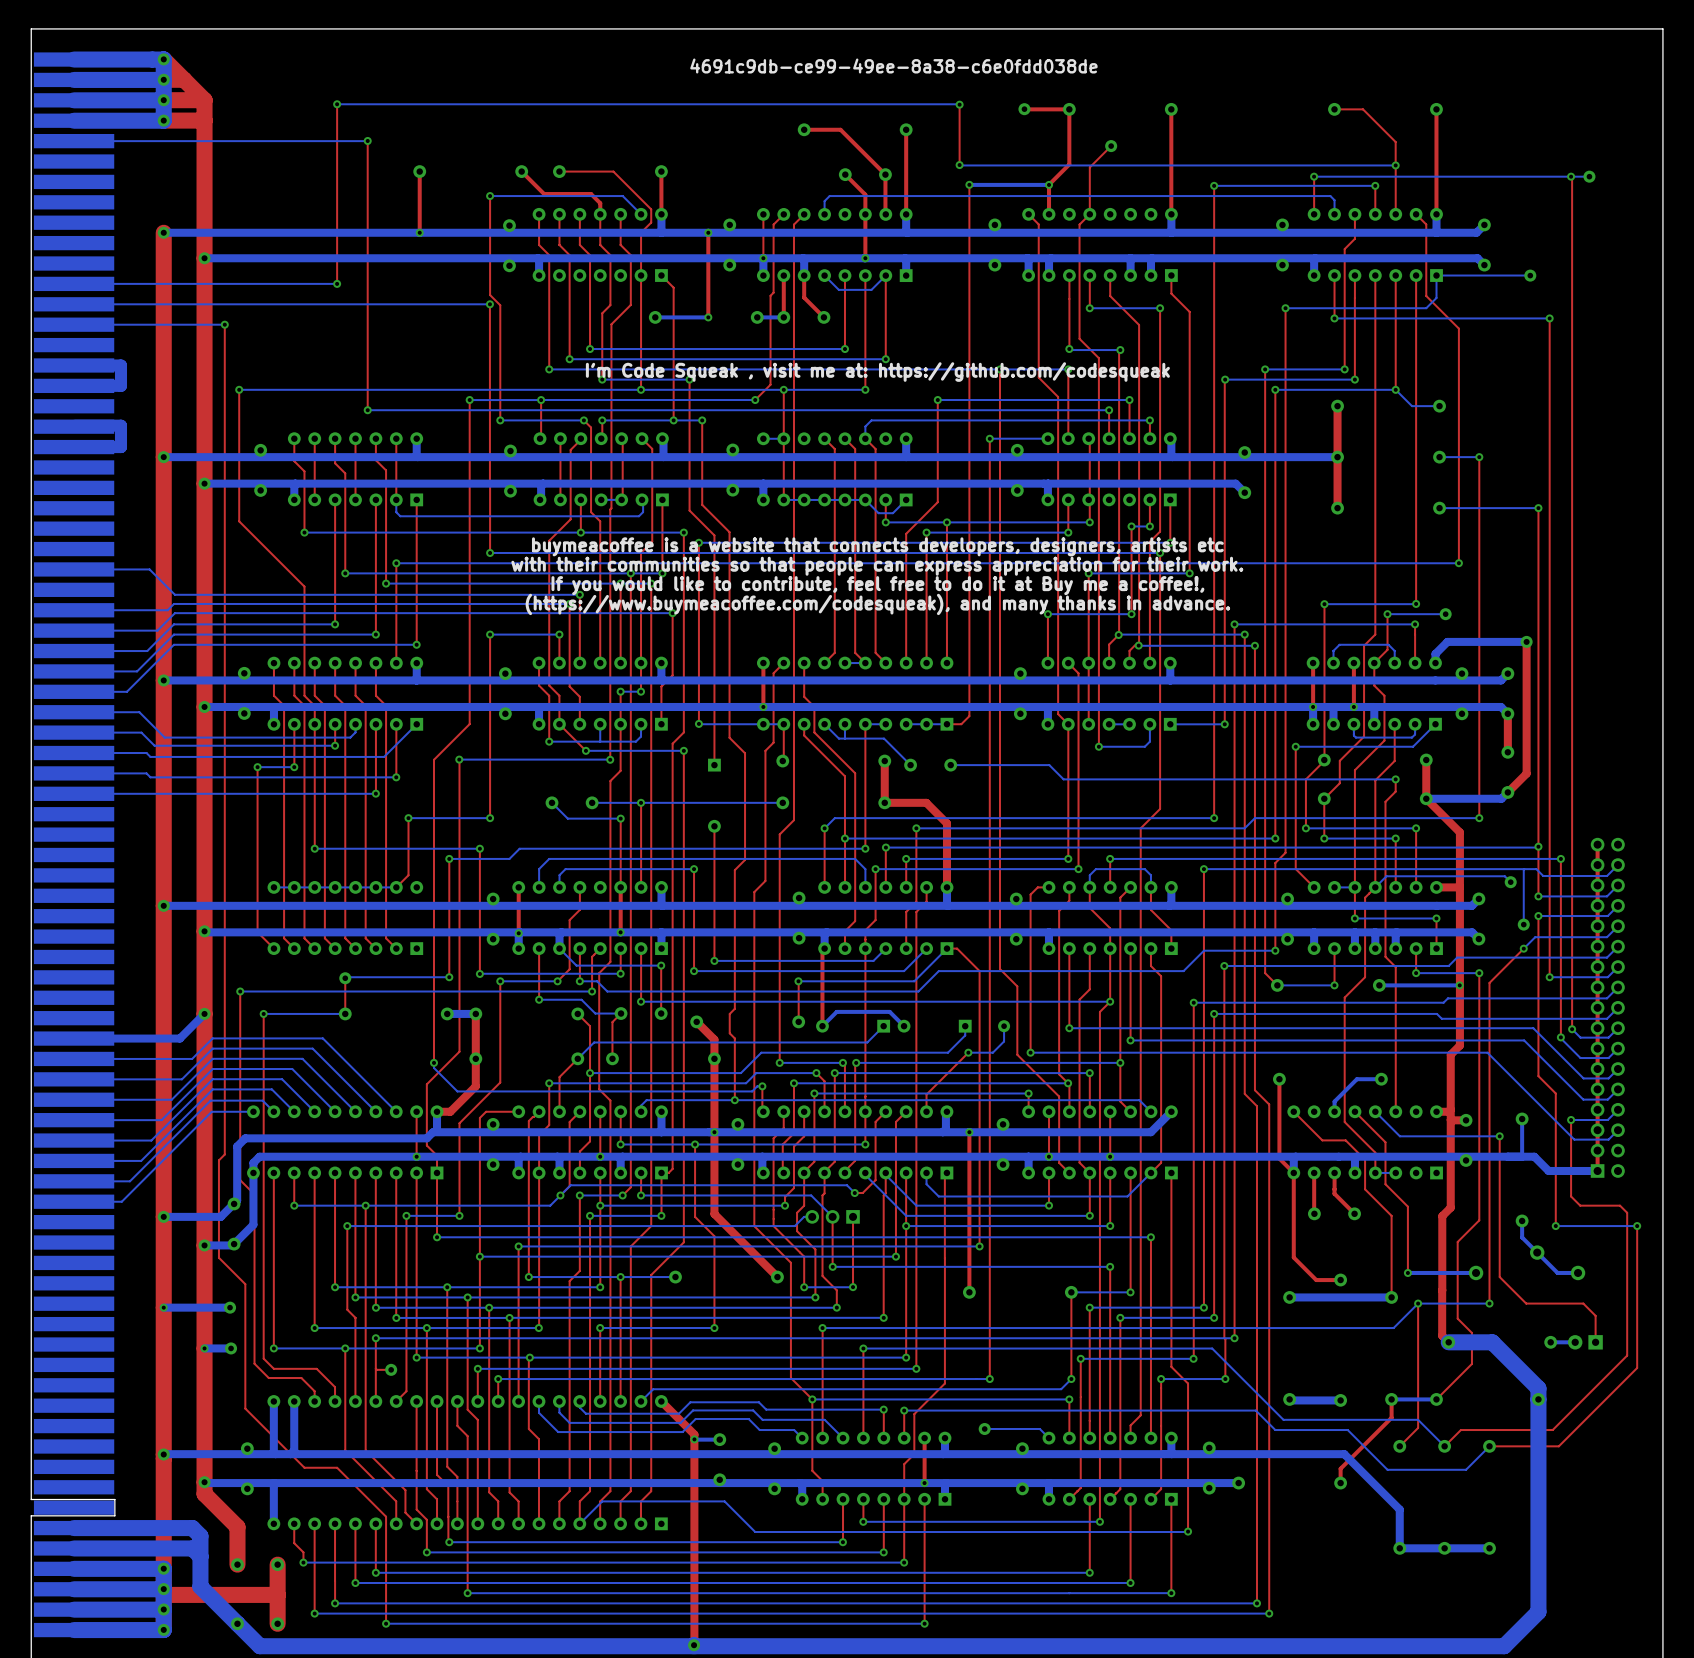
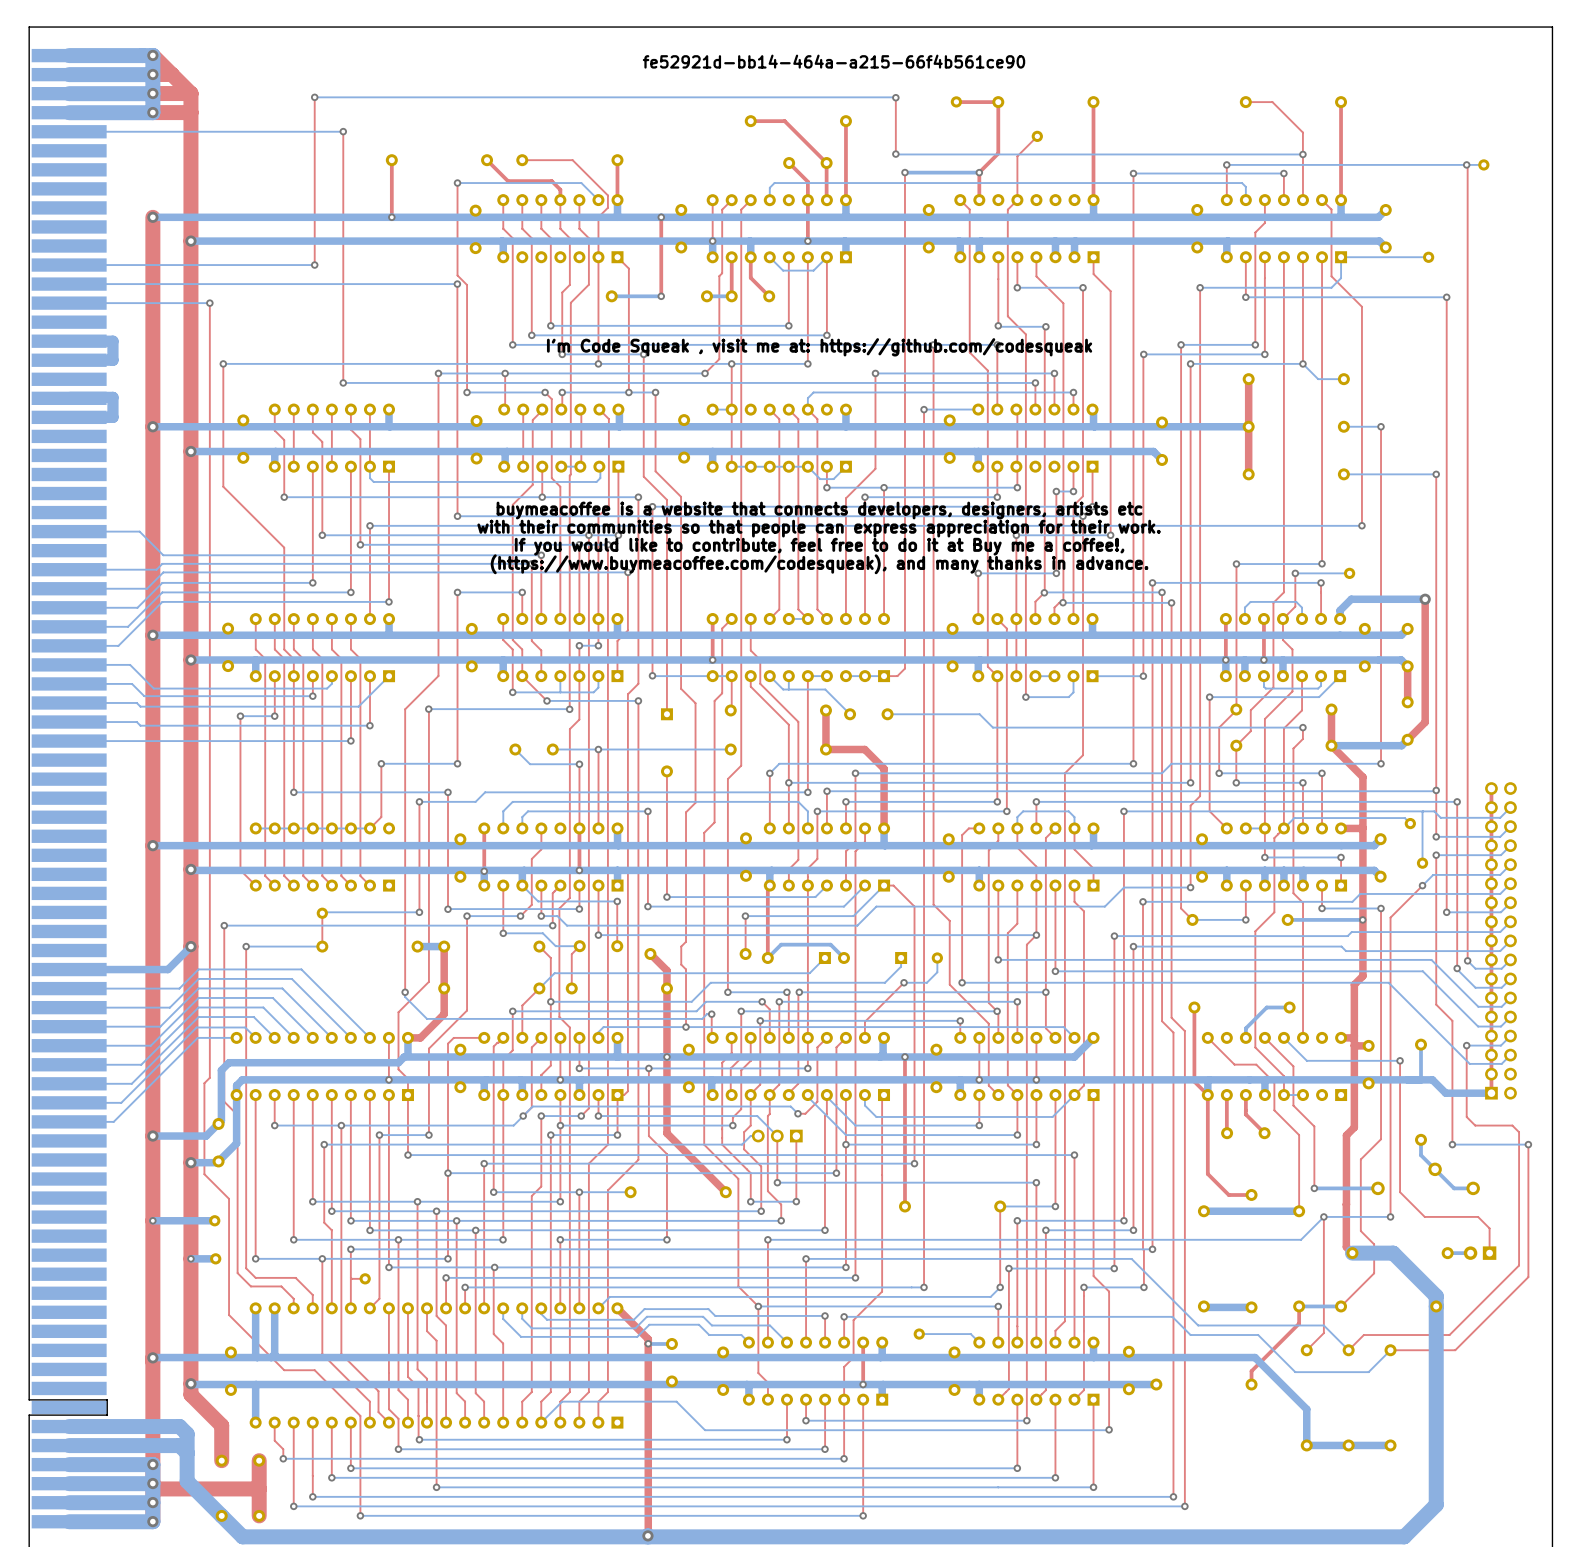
text: 4691c9db-ce99-49ee-8a38-c6e0fdd038de (893, 66) -> fe52921d-bb14-464a-a215-66f4b561ce90 (834, 61)

